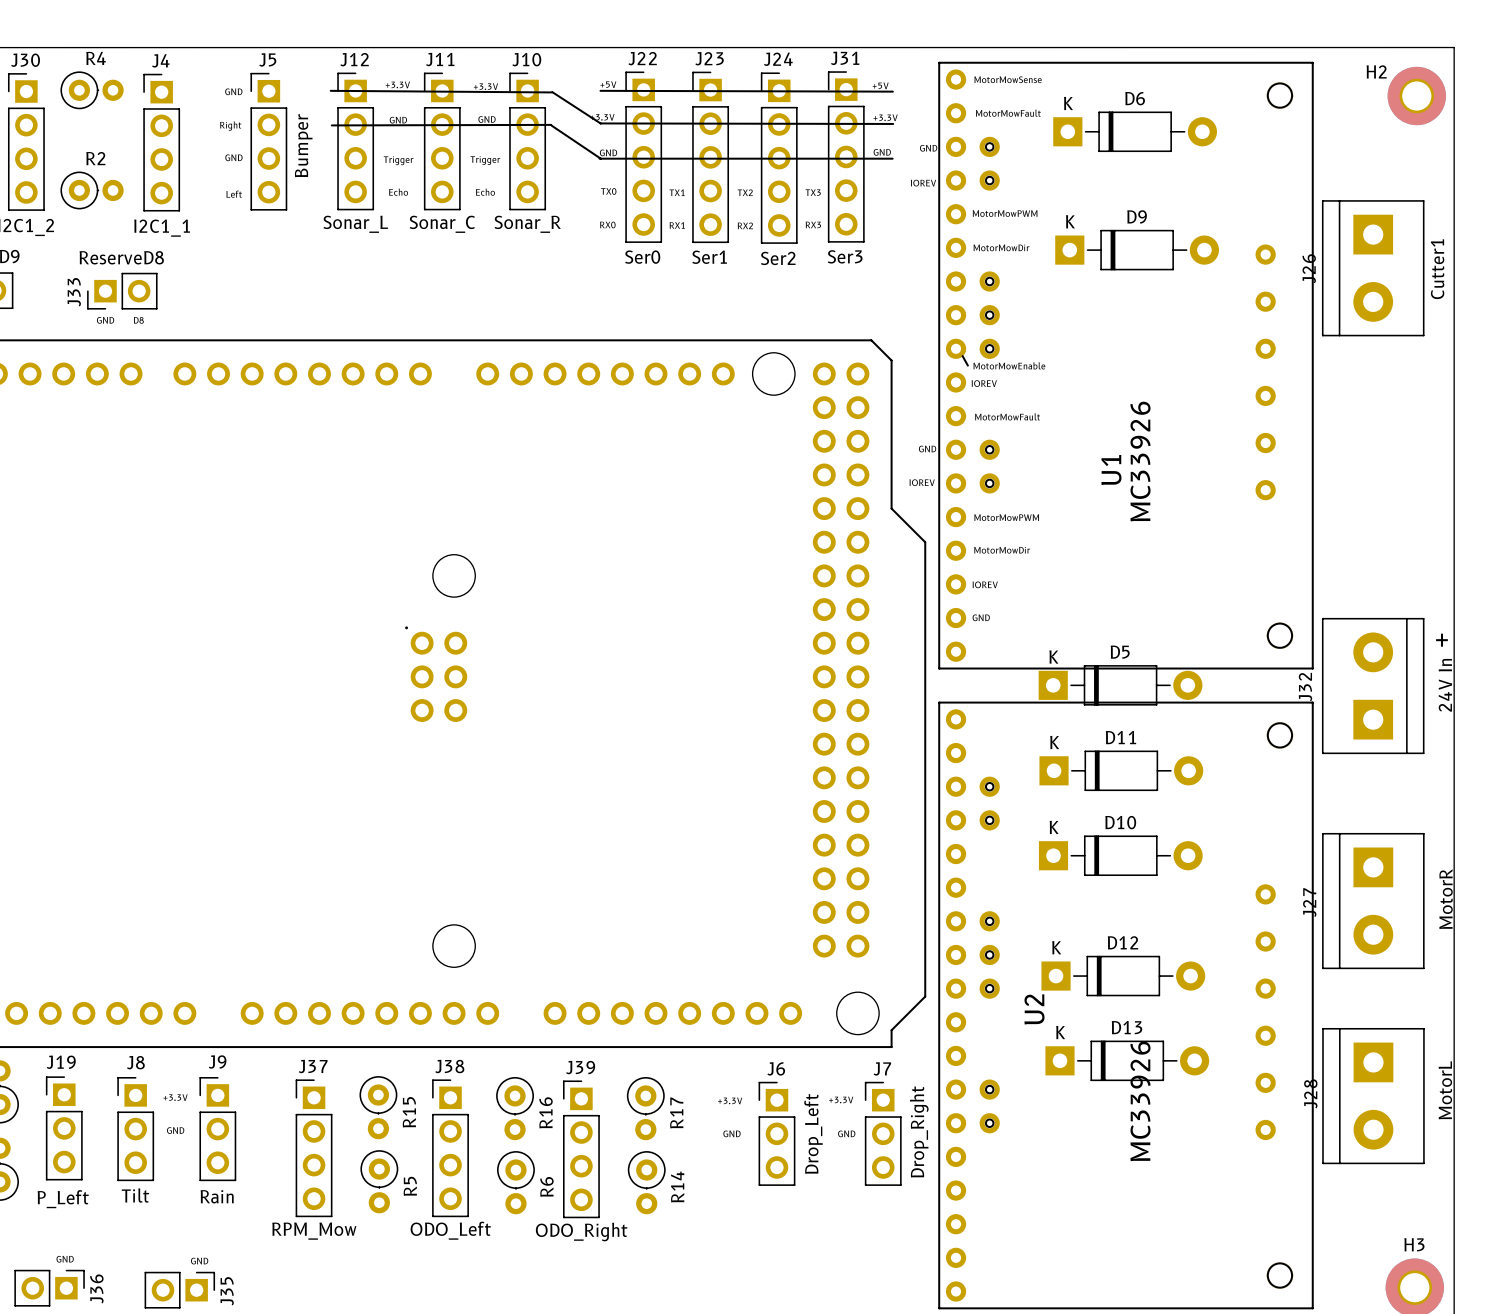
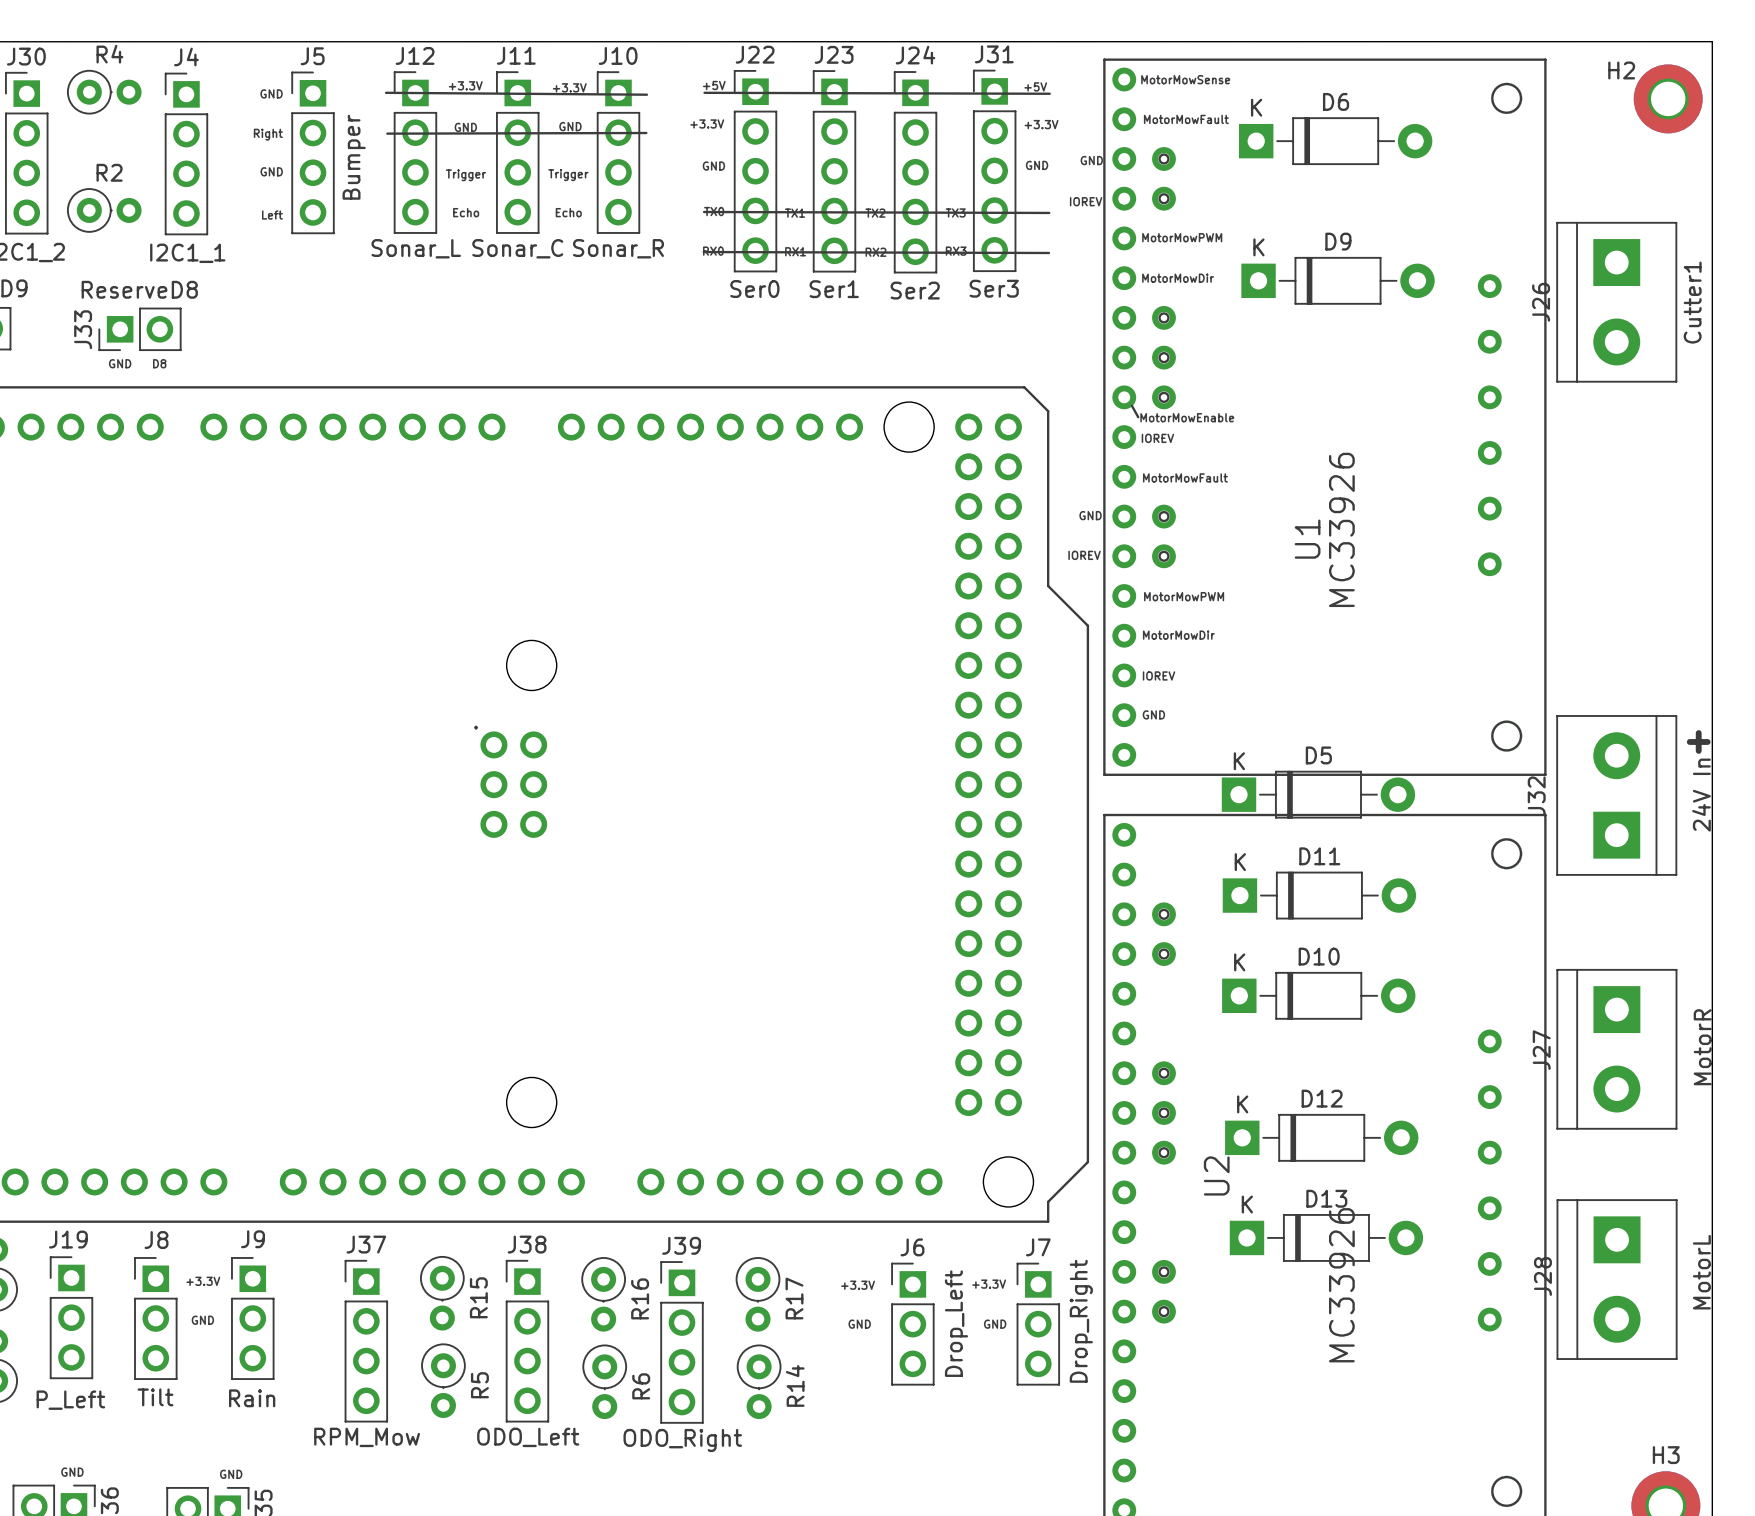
line: (552, 92) (600, 123) -> none
line: (600, 123) (893, 123) -> (704, 212) (1049, 212)
line: (551, 125) (600, 158) -> none
line: (599, 158) (892, 158) -> none
line: none -> (703, 252) (1048, 252)

